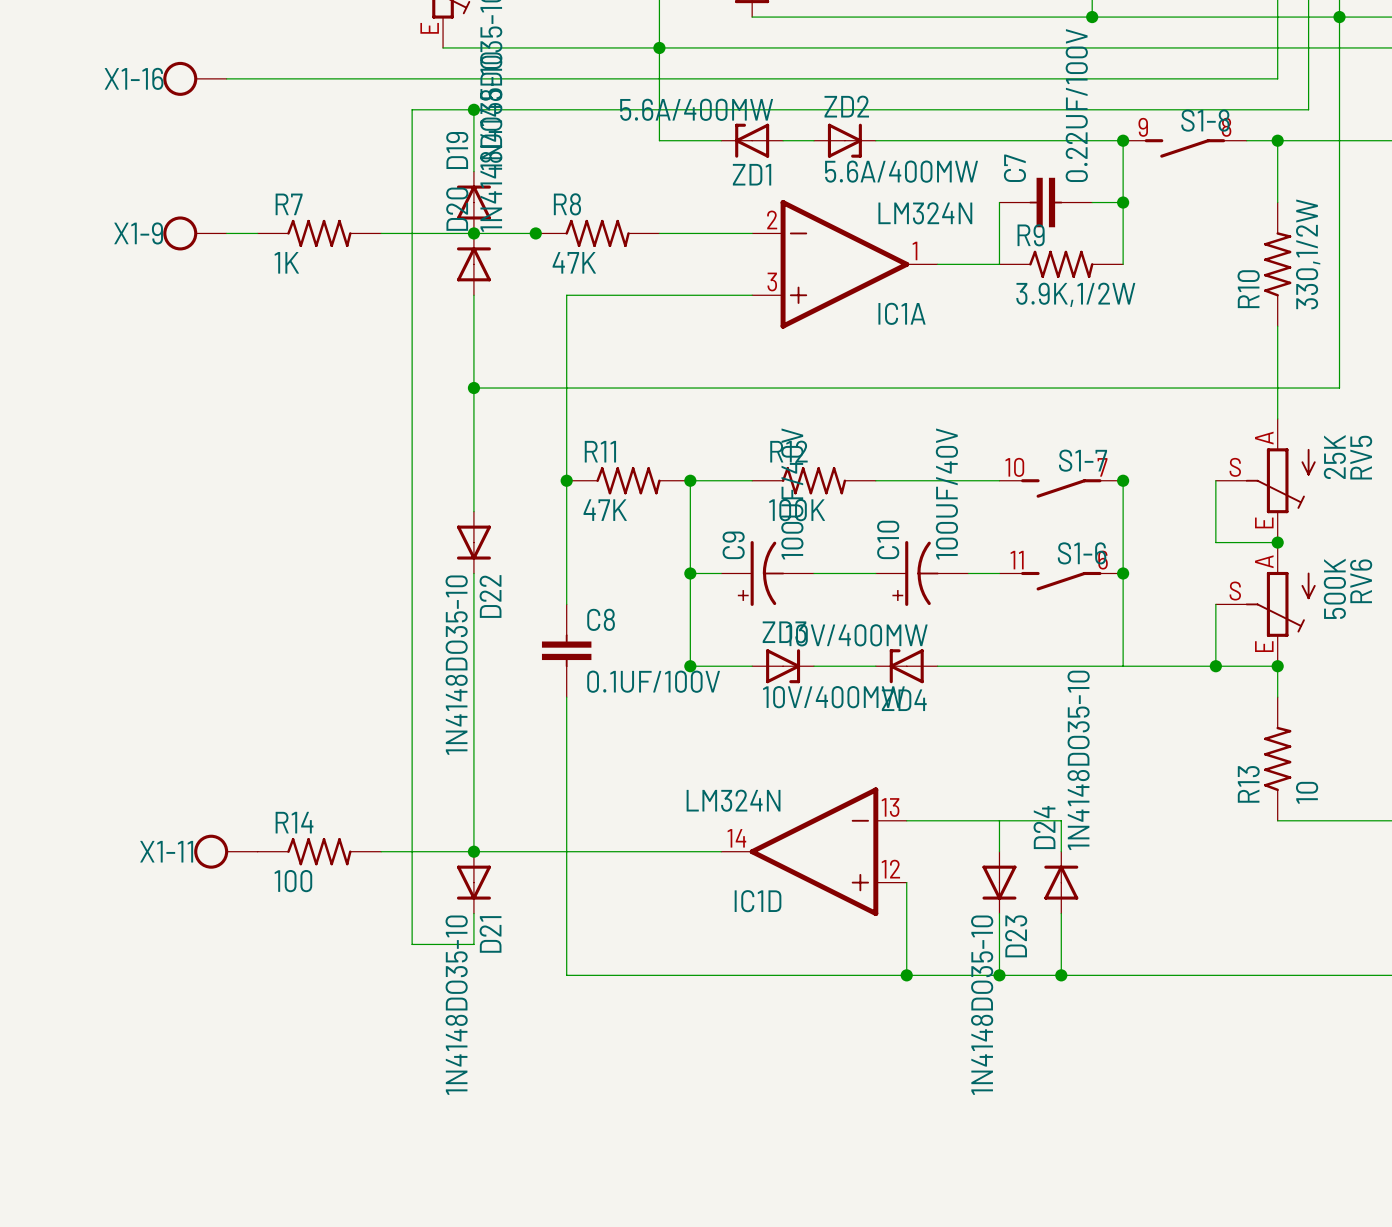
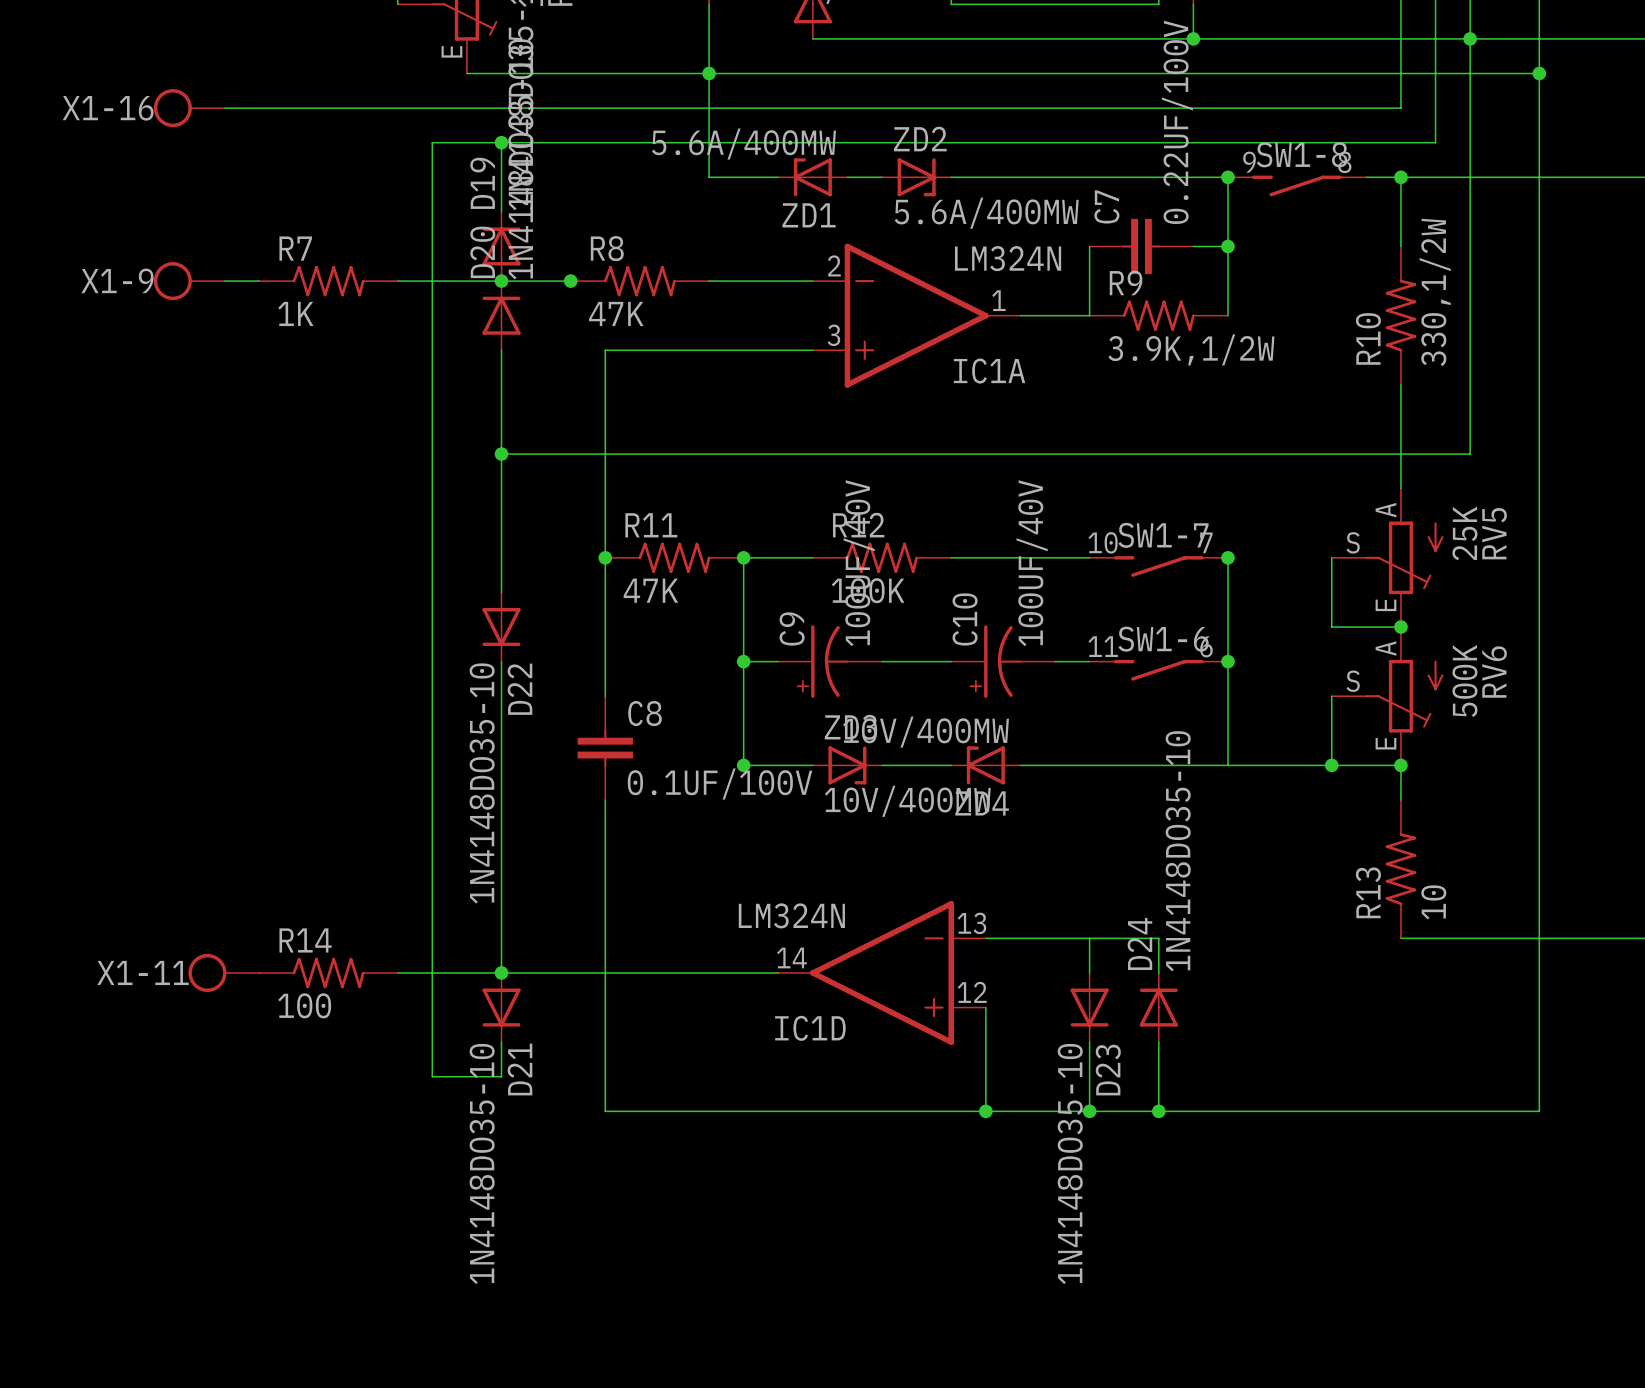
S1-8 name: S1-8 (1205, 120) -> SW1-8 (1302, 154)
S1-7 name: S1-7 (1083, 460) -> SW1-7 (1163, 535)
S1-6 name: S1-6 (1082, 553) -> SW1-6 (1163, 639)

